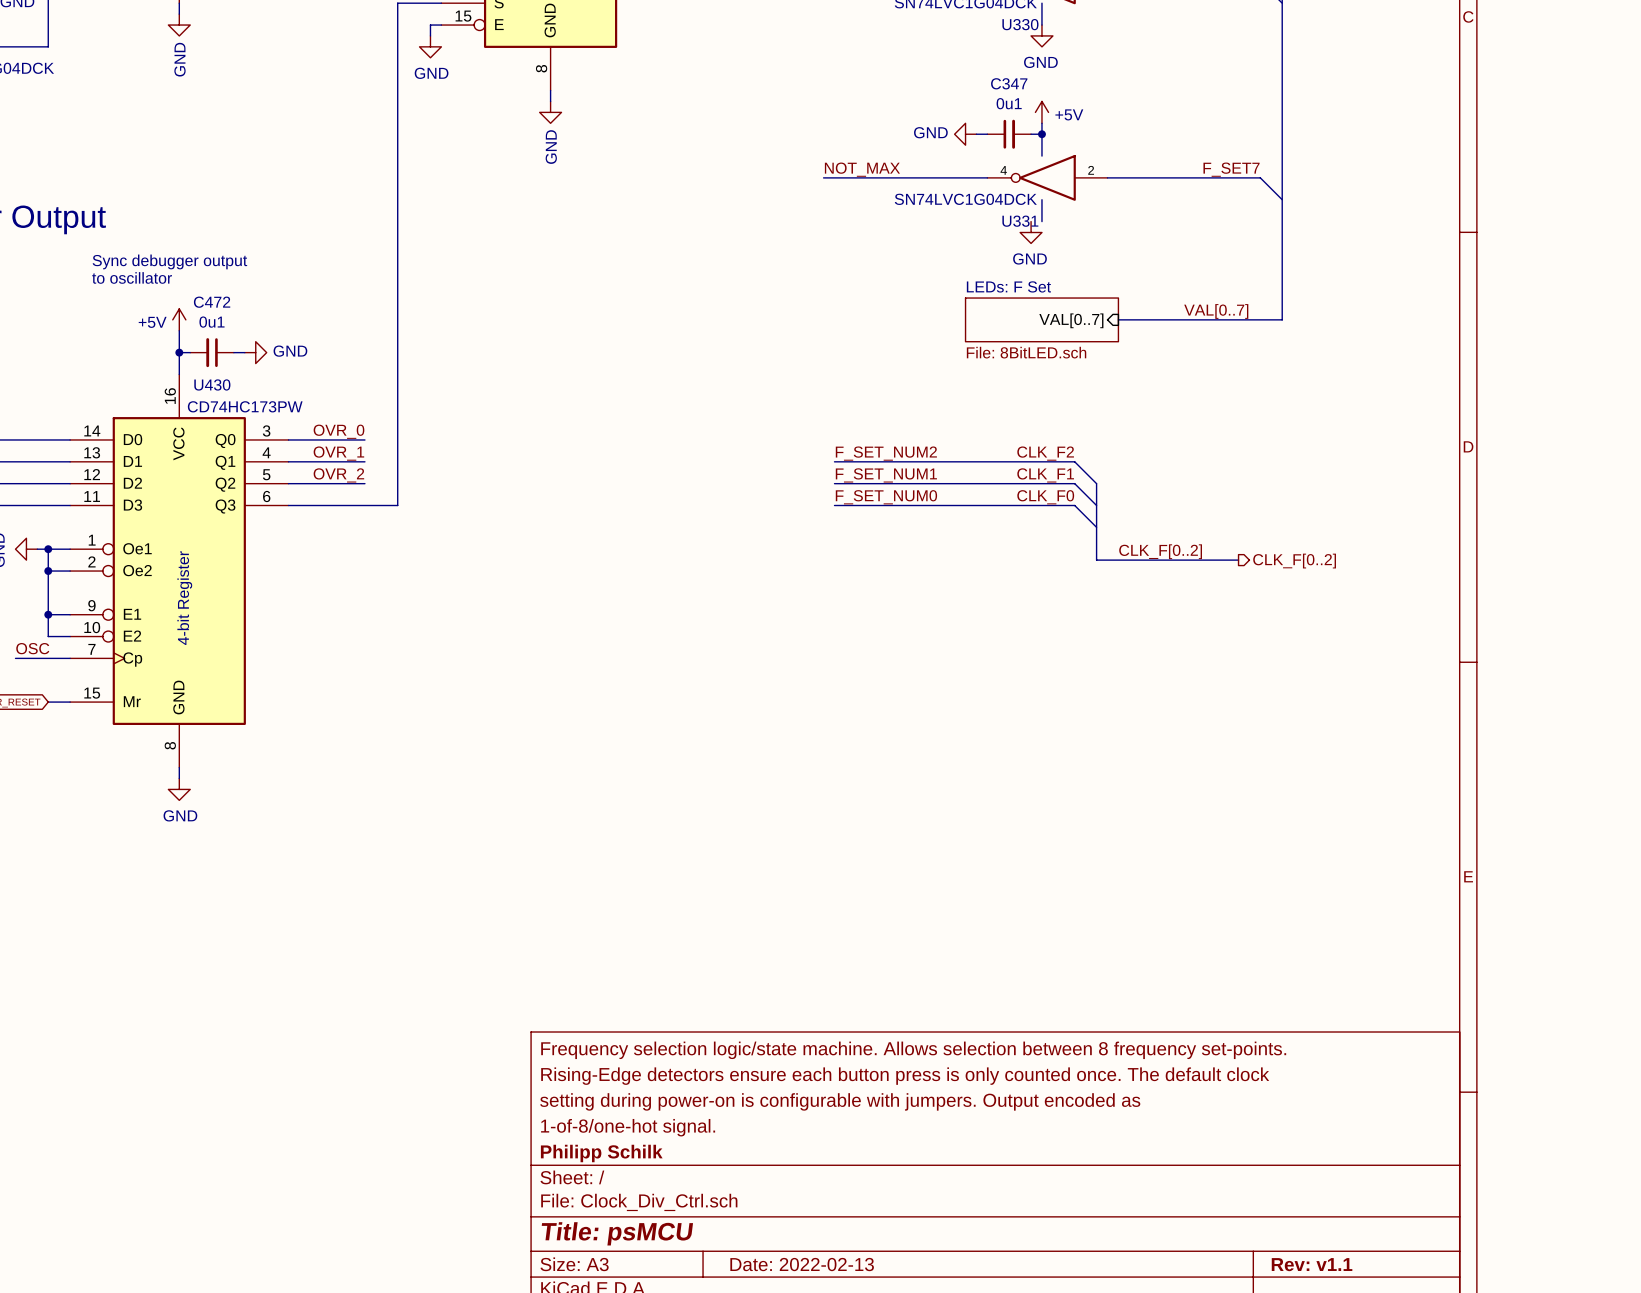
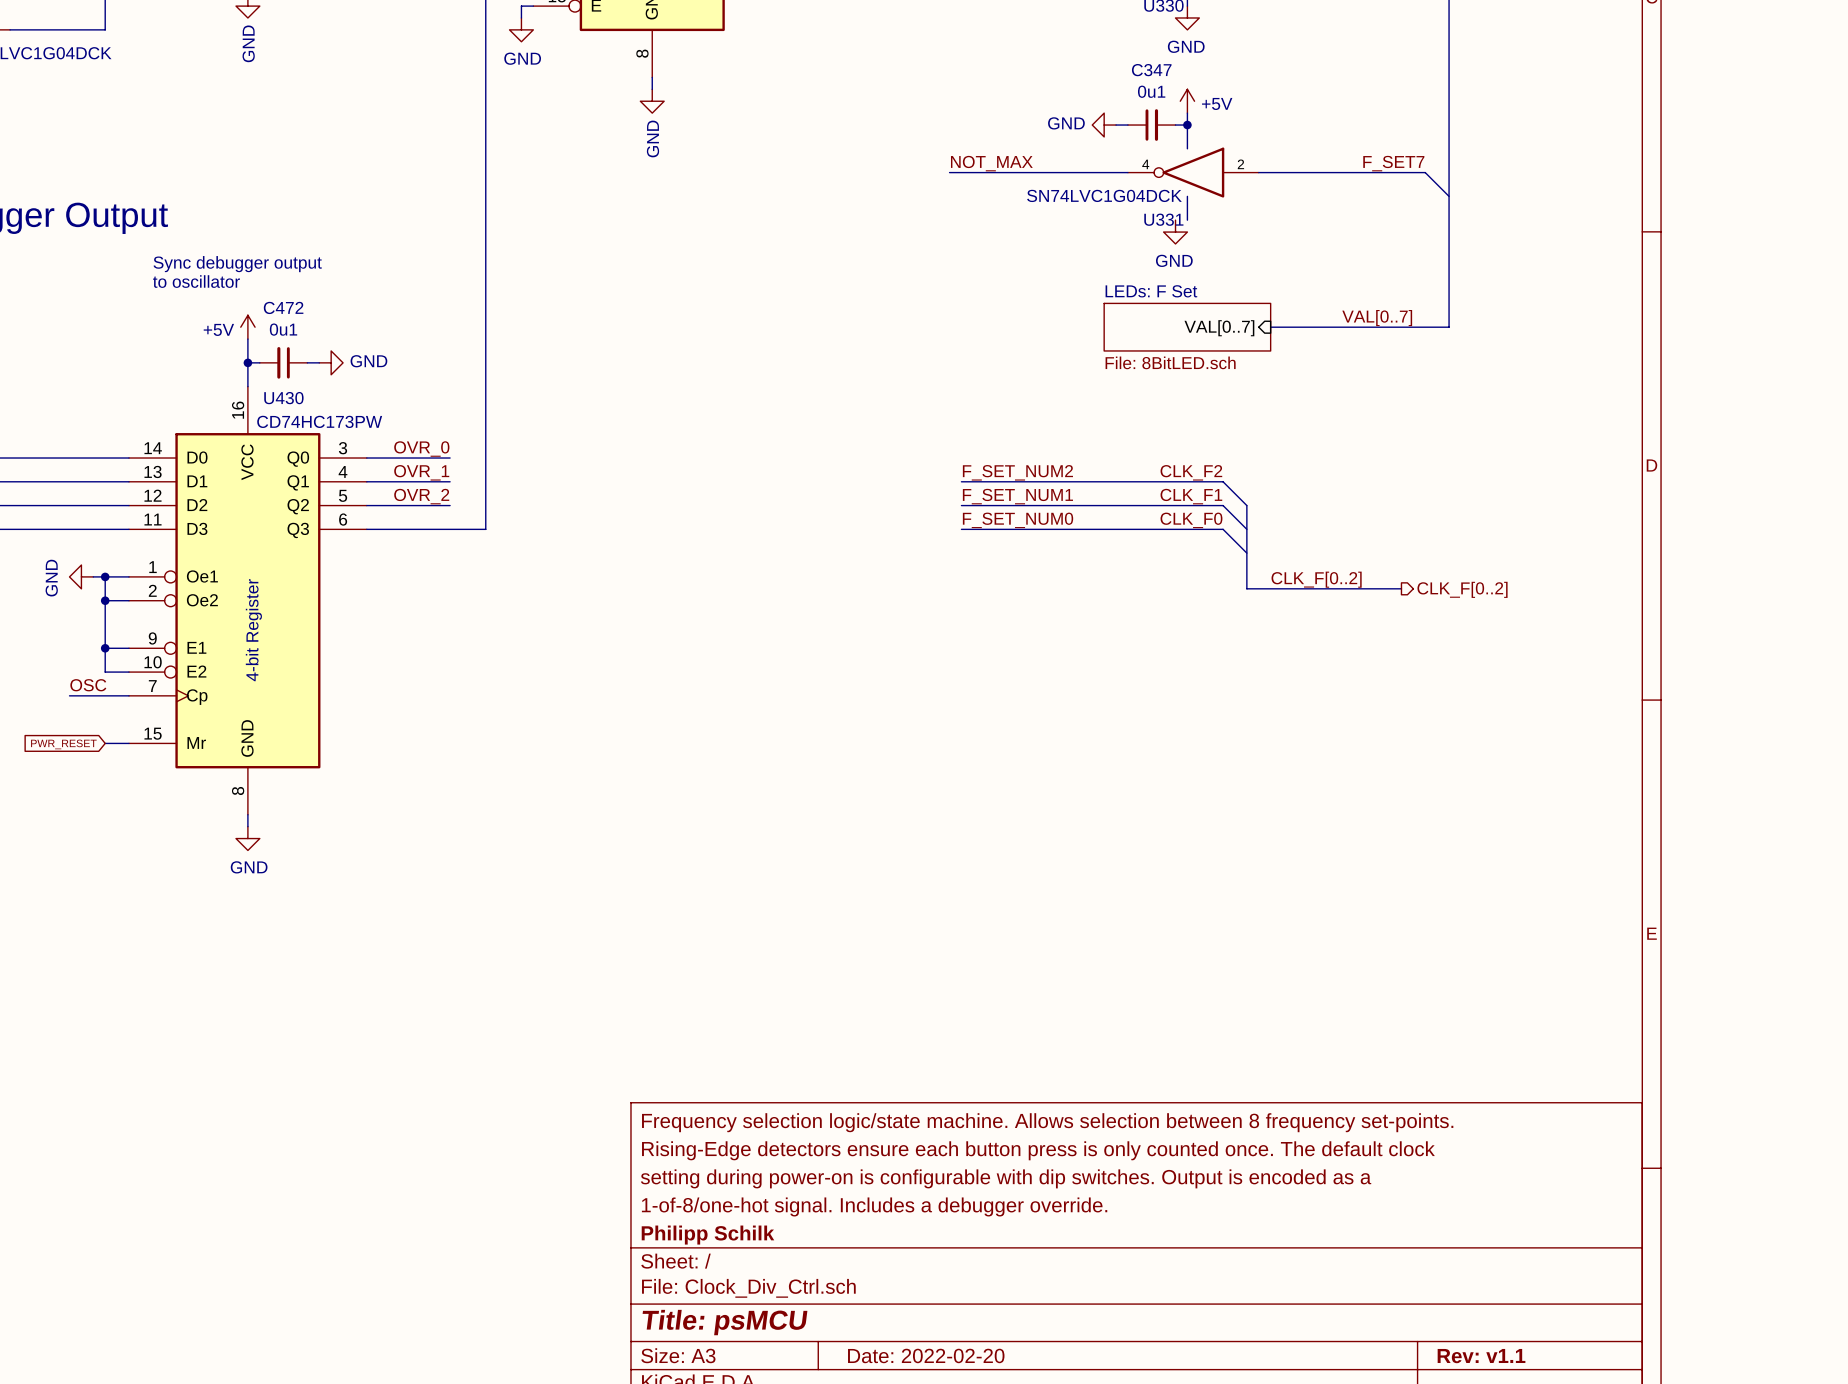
title block: setting during power-on is configurable with jumpers. Output encoded as (840, 1101) -> setting during power-on is configurable with dip switches. Output is encoded as a (1006, 1178)
title block: 1-of-8/one-hot signal. (628, 1127) -> 1-of-8/one-hot signal. Includes a debugger override. (874, 1206)
title block: Date: 2022-02-13 (802, 1264) -> Date: 2022-02-20 (926, 1355)

